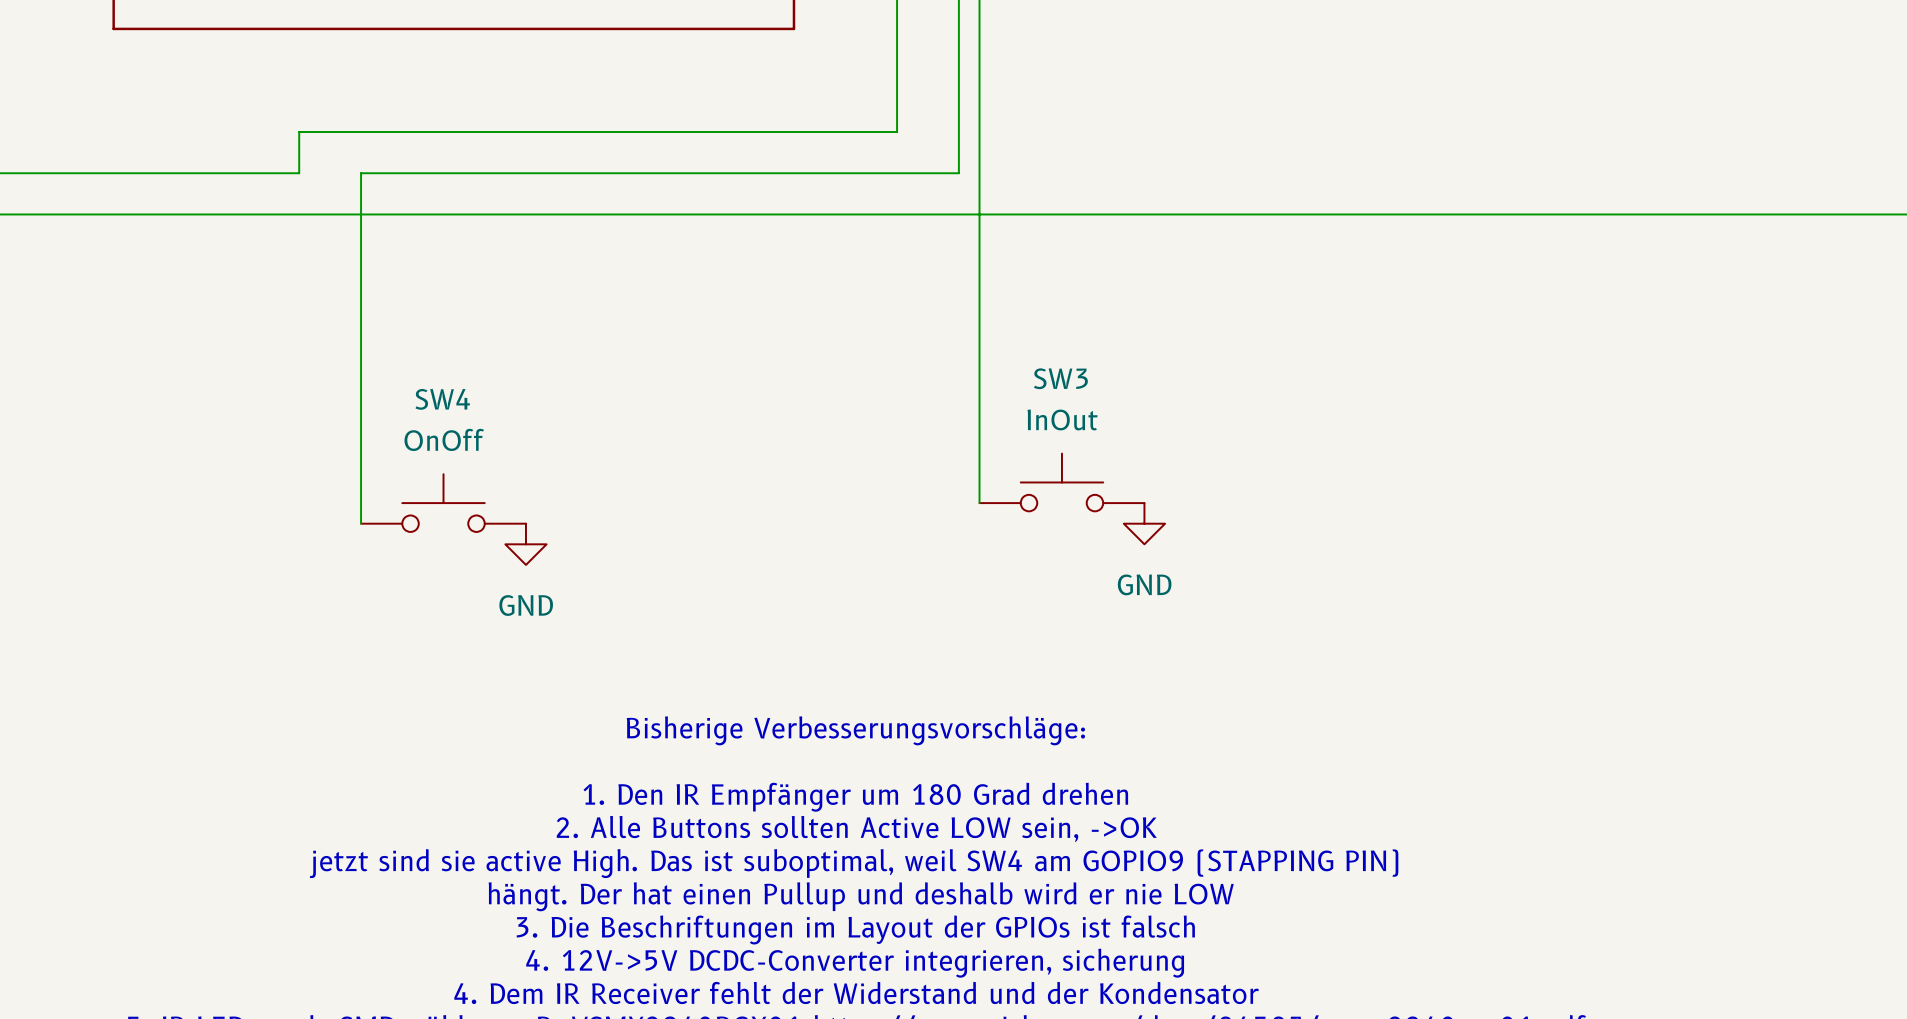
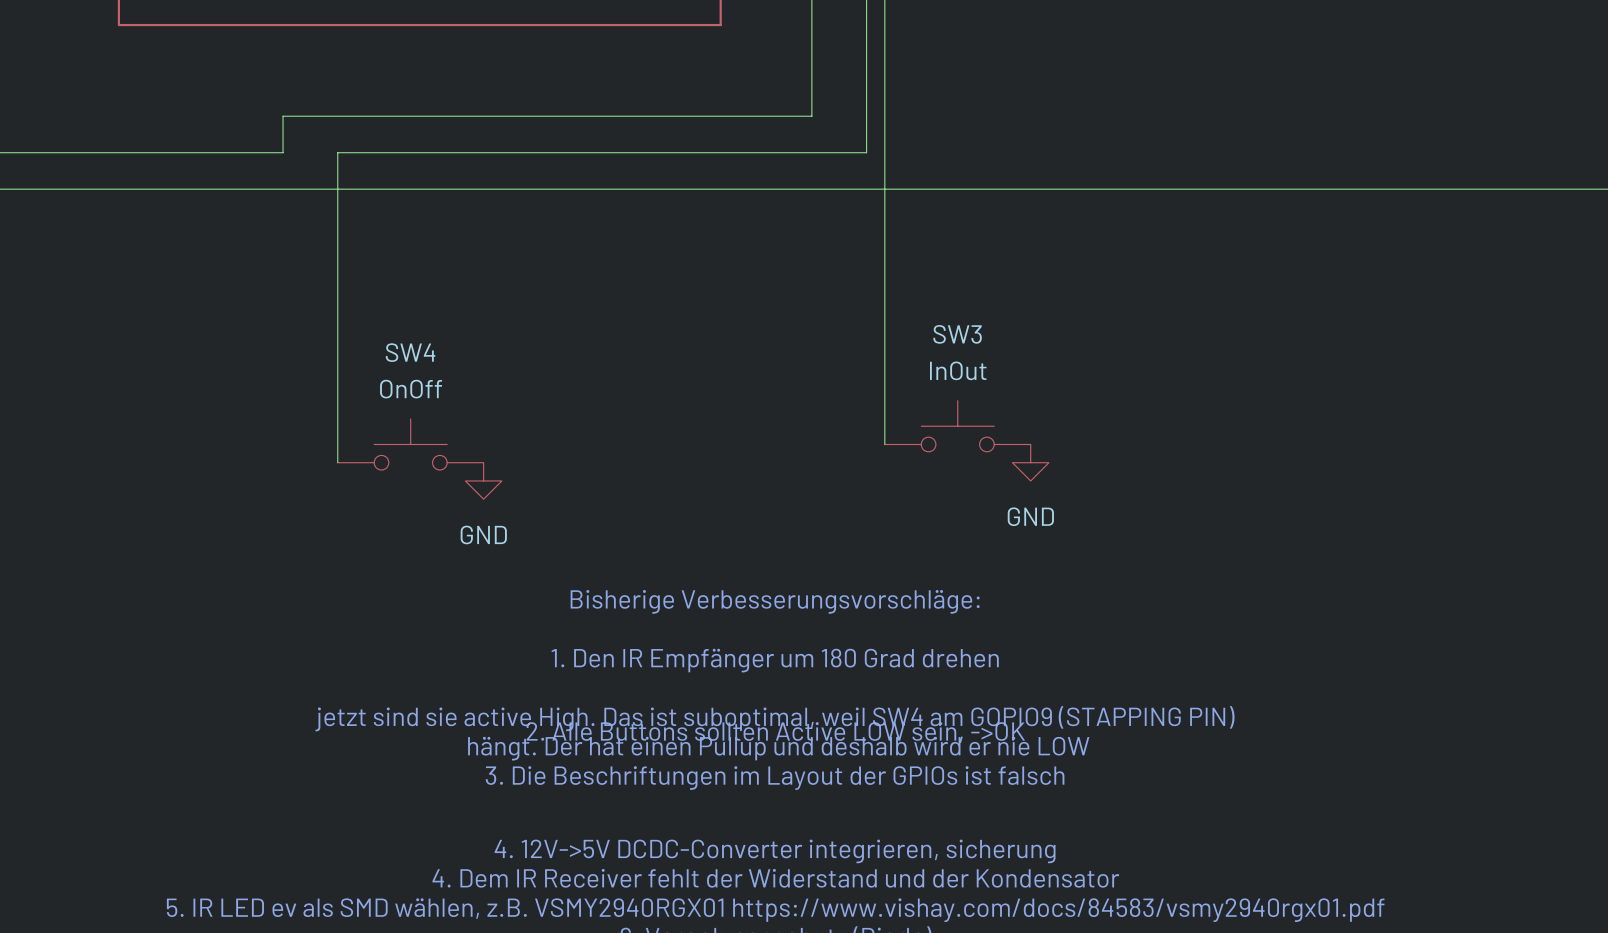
text position: Bisherige Verbesserungsvorschläge: (855, 730) -> Bisherige Verbesserungsvorschläge: (775, 601)
text position: 1. Den IR Empfänger um 180 Grad drehen (855, 797) -> 1. Den IR Empfänger um 180 Grad drehen (775, 660)
text position: jetzt sind sie active High. Das ist suboptimal, weil SW4 am GOPIO9 (STAPPING PIN) (854, 863) -> jetzt sind sie active High. Das ist suboptimal, weil SW4 am GOPIO9 (STAPPING PIN) (774, 718)
text position: hängt. Der hat einen Pullup und deshalb wird er nie LOW (861, 896) -> hängt. Der hat einen Pullup und deshalb wird er nie LOW (778, 748)
text position: 3. Die Beschriftungen im Layout der GPIOs ist falsch (855, 929) -> 3. Die Beschriftungen im Layout der GPIOs ist falsch (775, 778)

